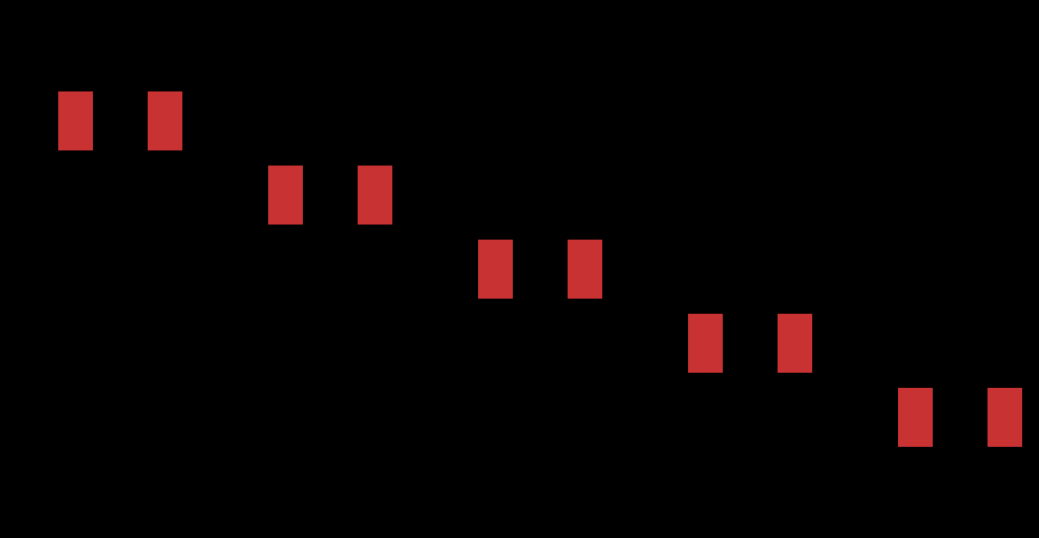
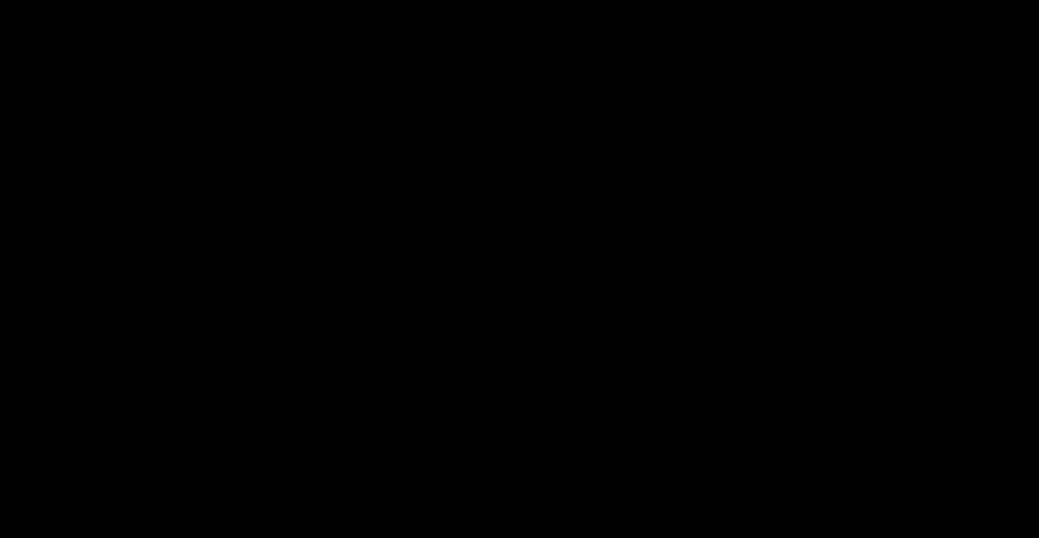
part: (120, 120) -> none
part: (330, 195) -> none
part: (540, 269) -> none
part: (750, 343) -> none
part: (960, 417) -> none

